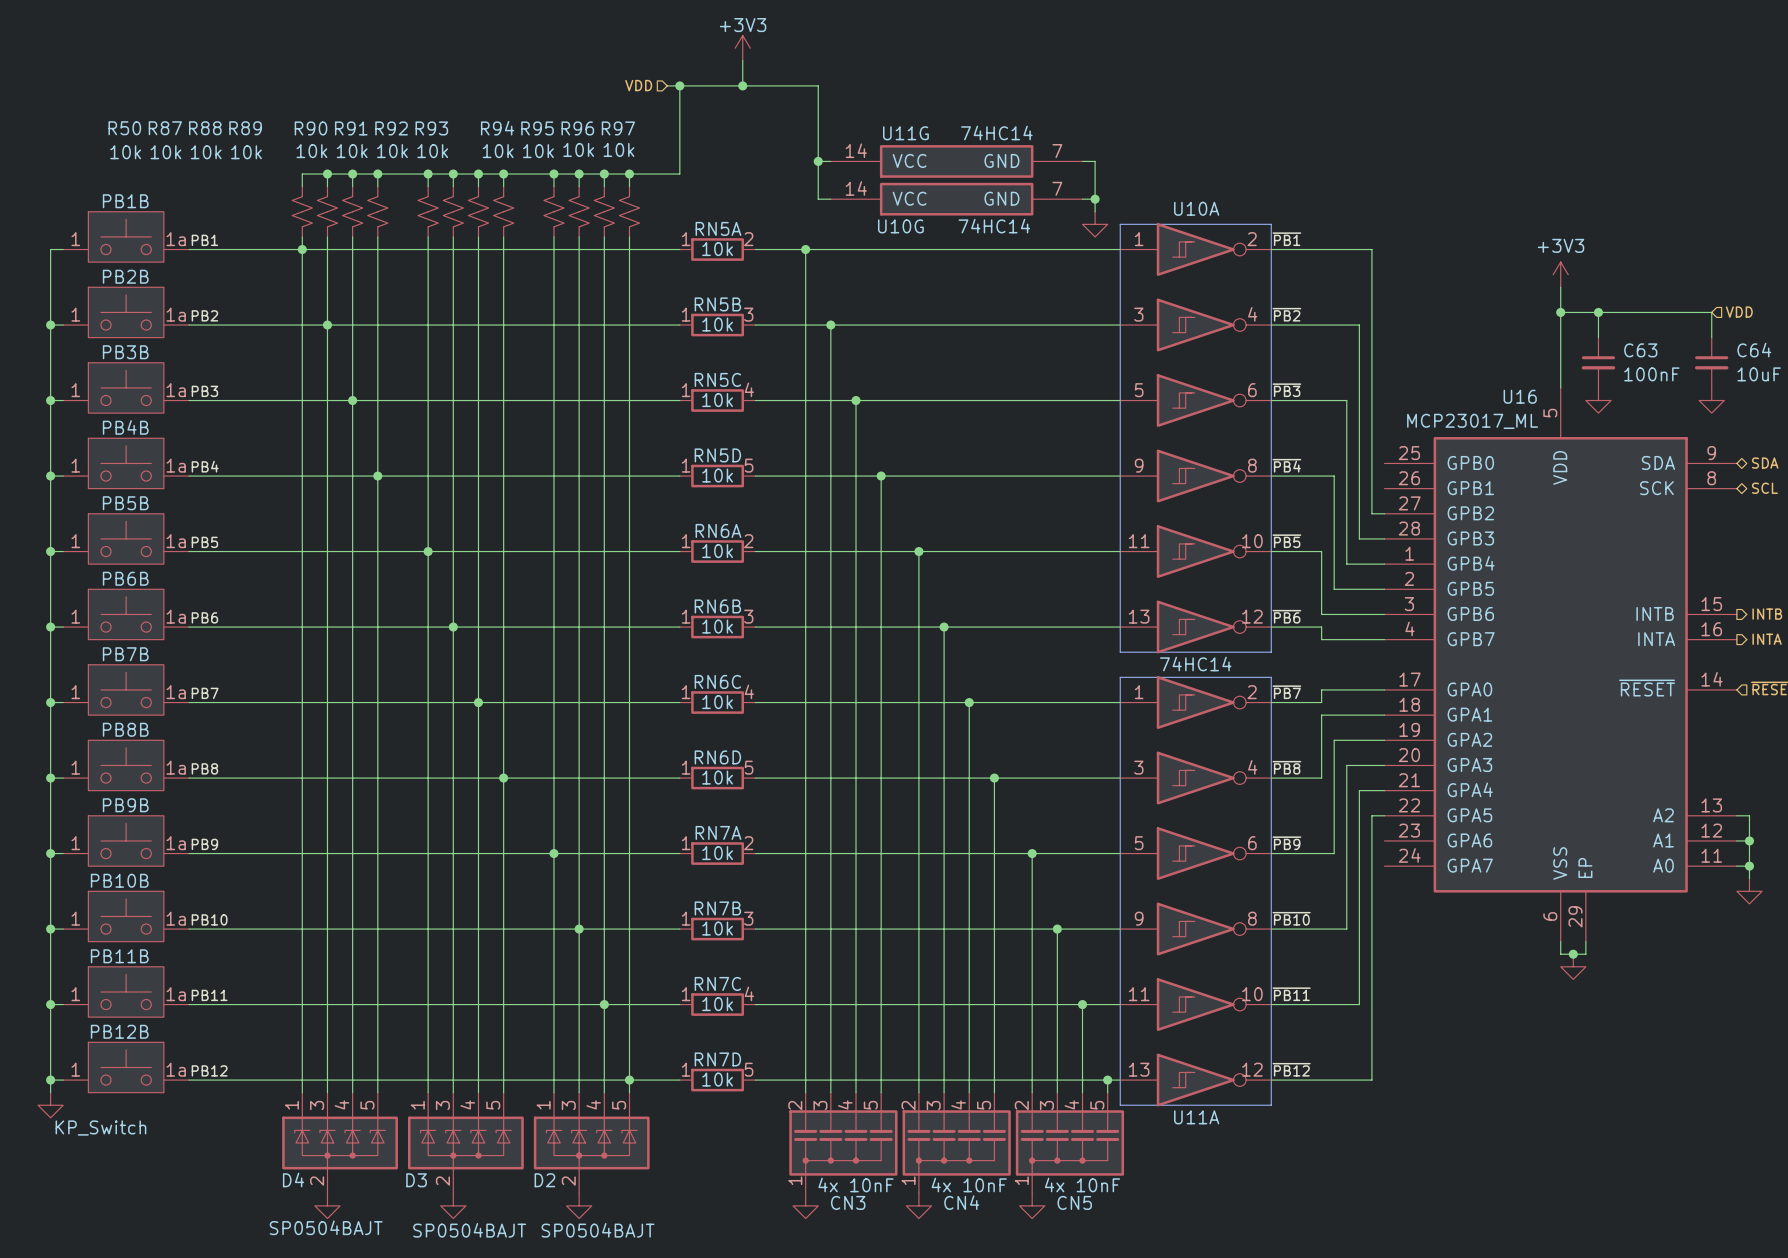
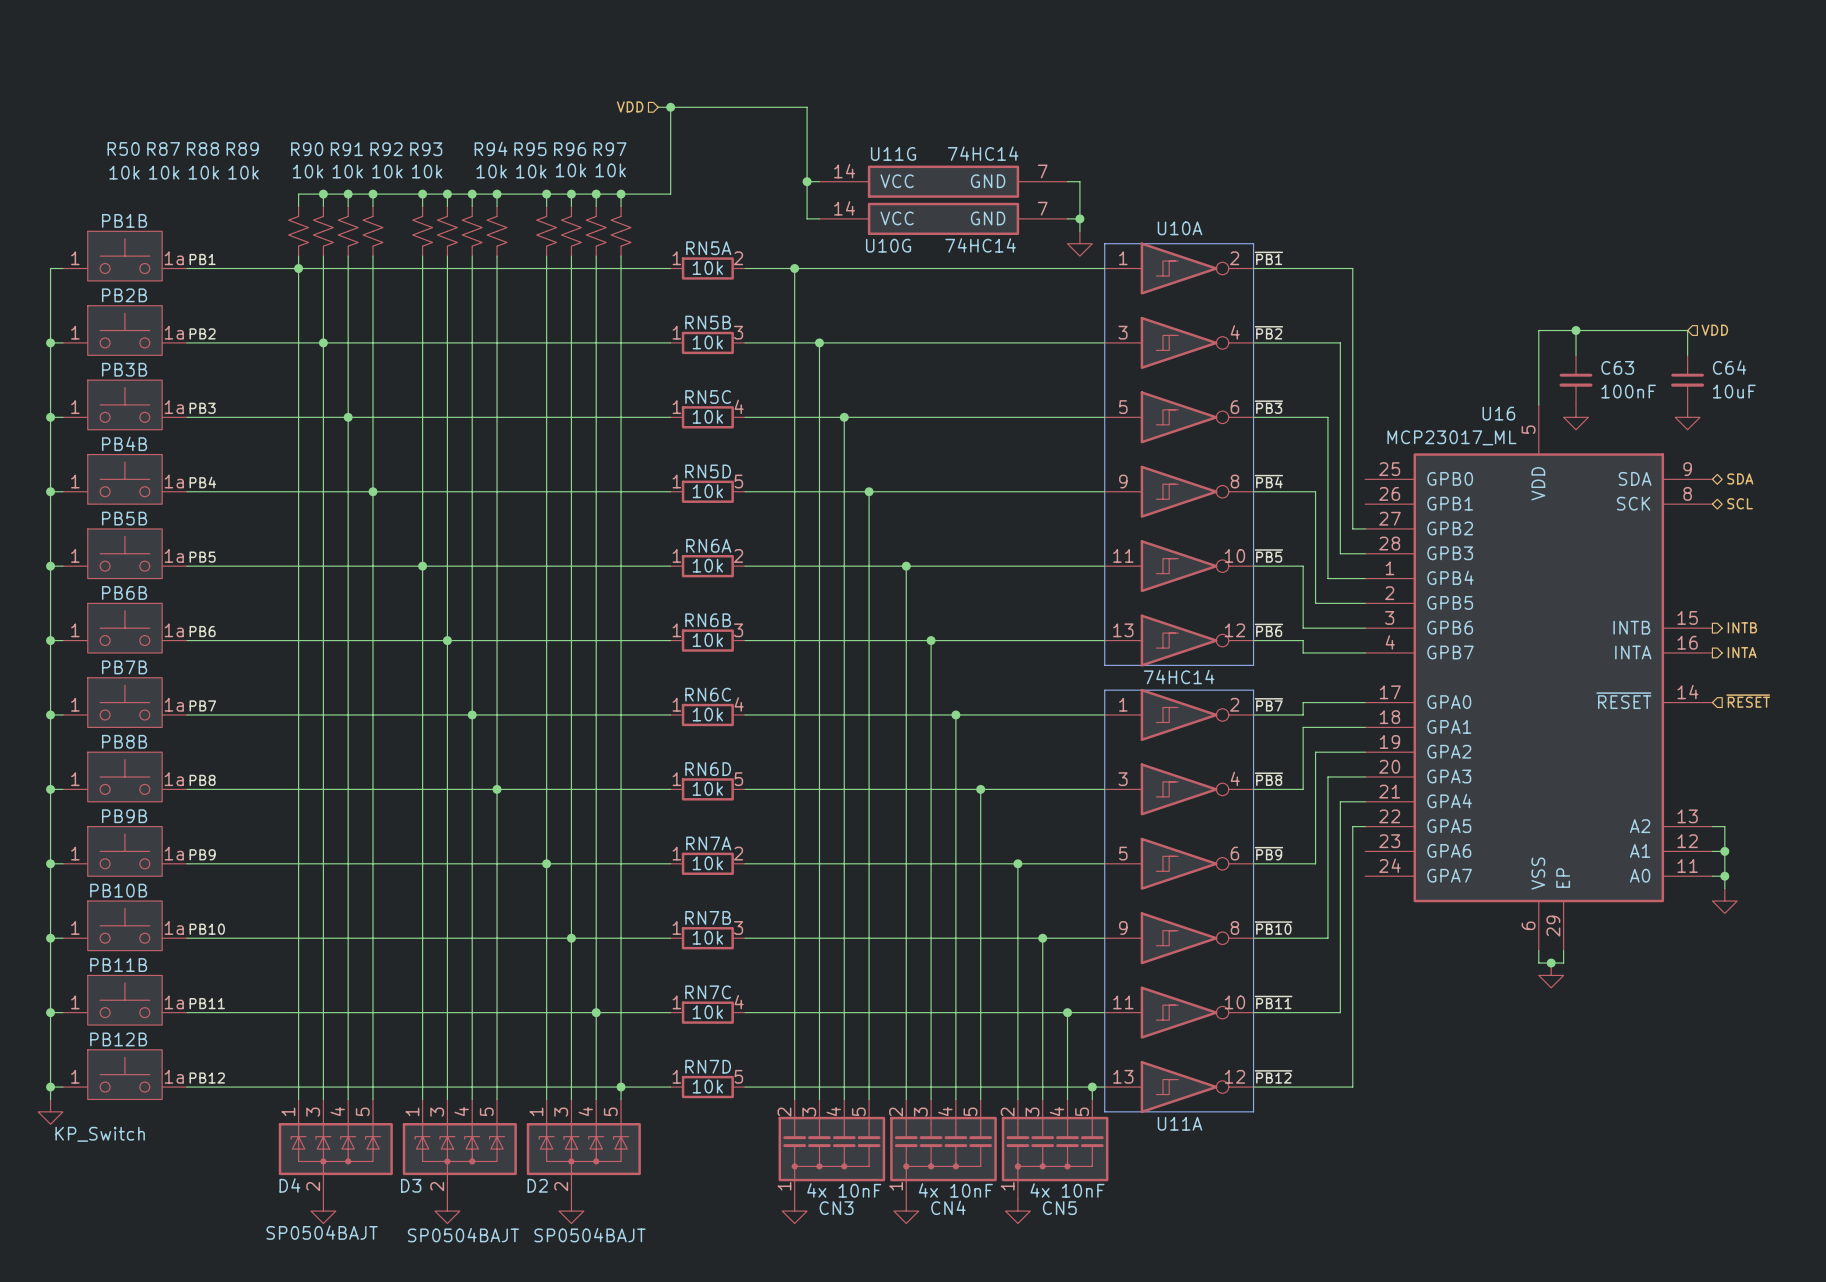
power symbol: +3V3 (742, 48) -> none
wire: (742, 60) (742, 85) -> none
junction: (742, 85) -> none
power symbol: +3V3 (1560, 274) -> none
wire: (1560, 287) (1560, 312) -> none
junction: (1560, 312) -> none

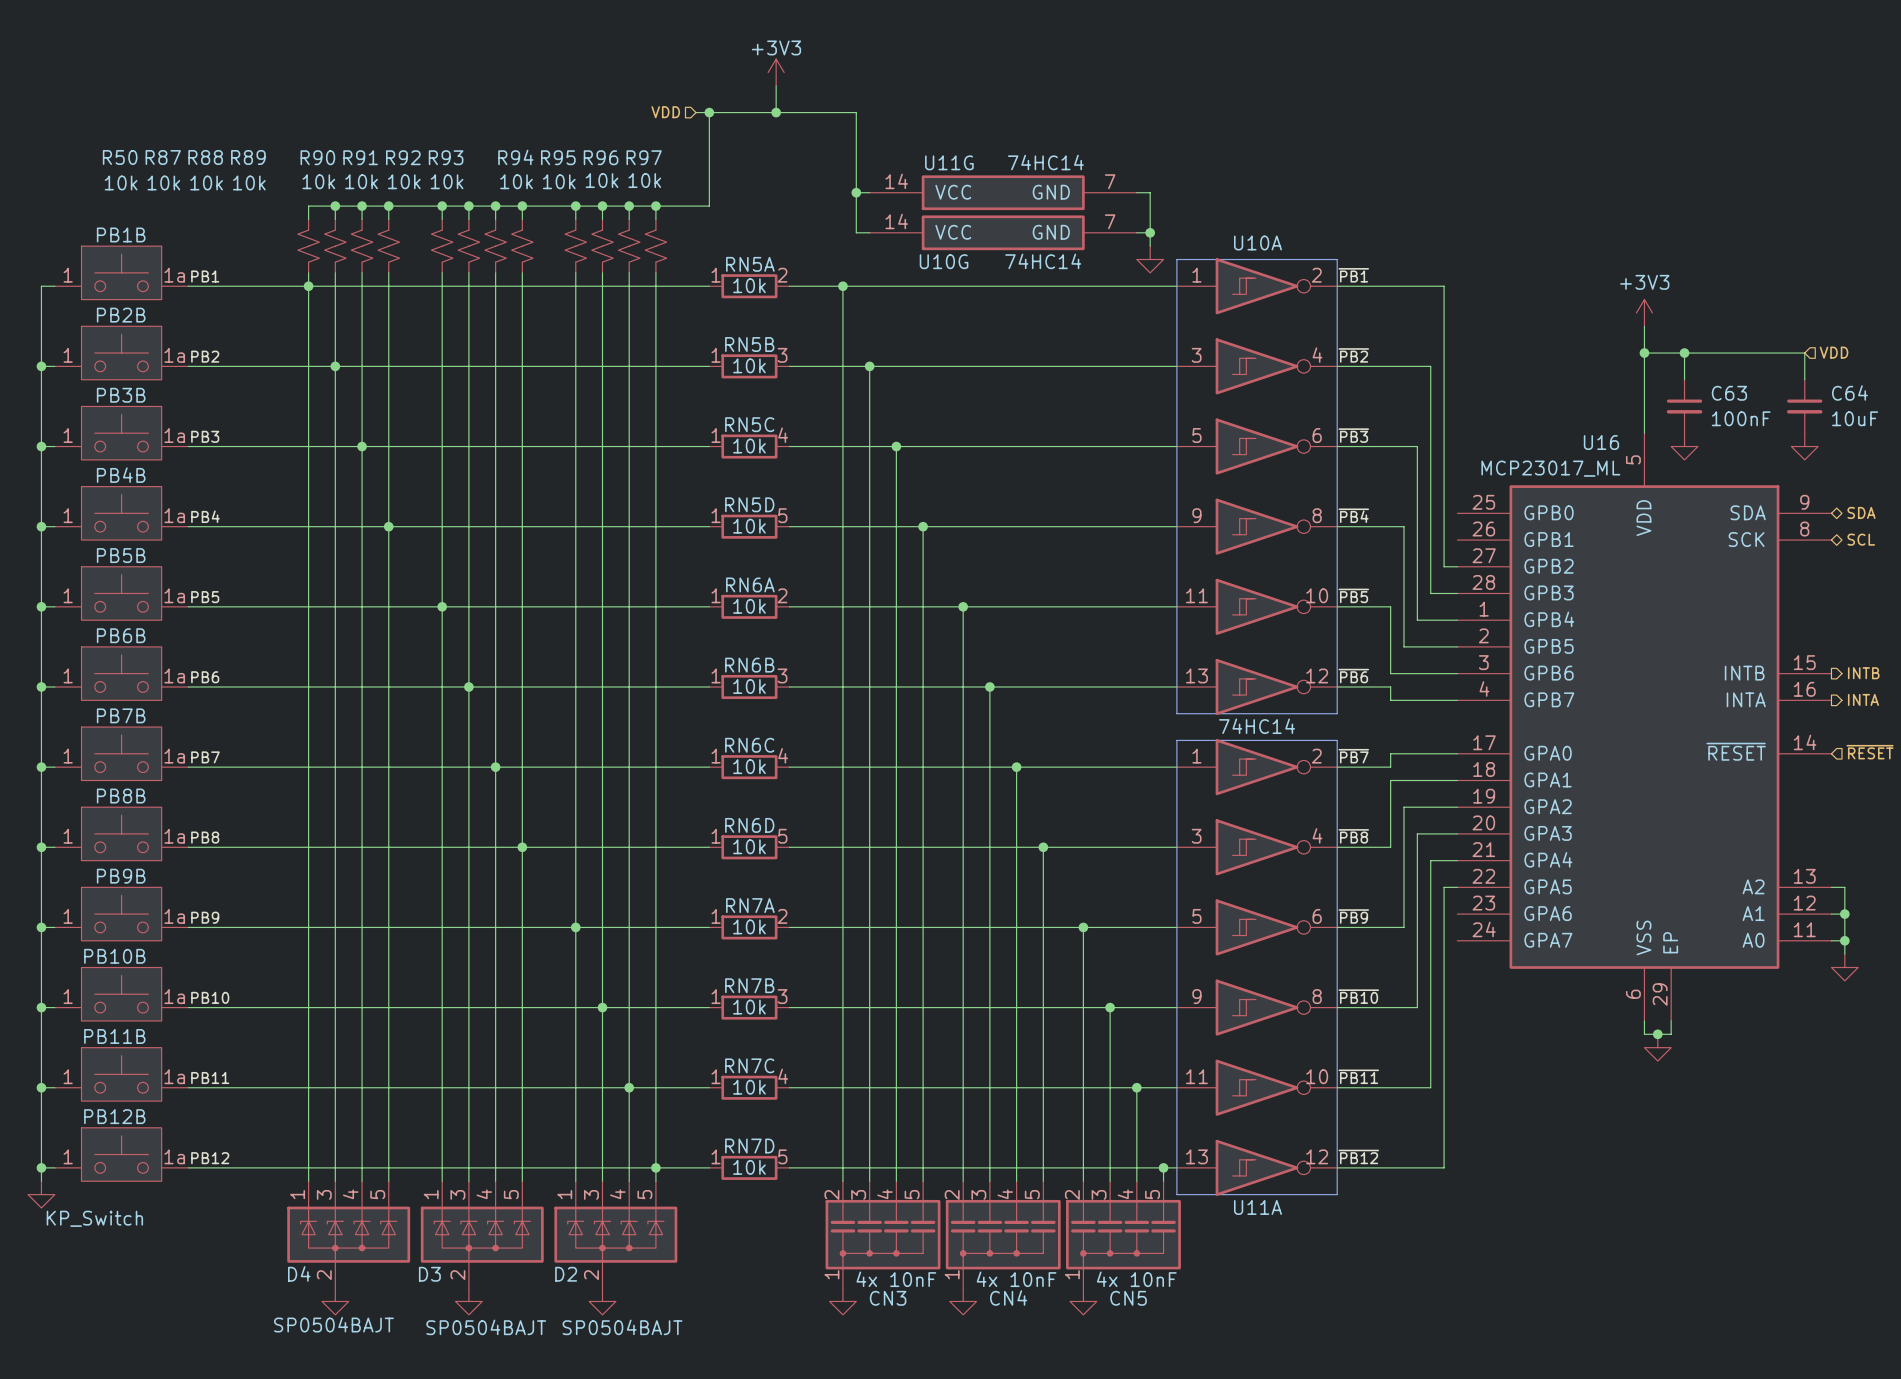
power symbol: none -> +3V3 (776, 72)
wire: none -> (776, 85) (776, 112)
junction: none -> (776, 112)
power symbol: none -> +3V3 (1644, 312)
wire: none -> (1644, 326) (1644, 353)
junction: none -> (1644, 353)

